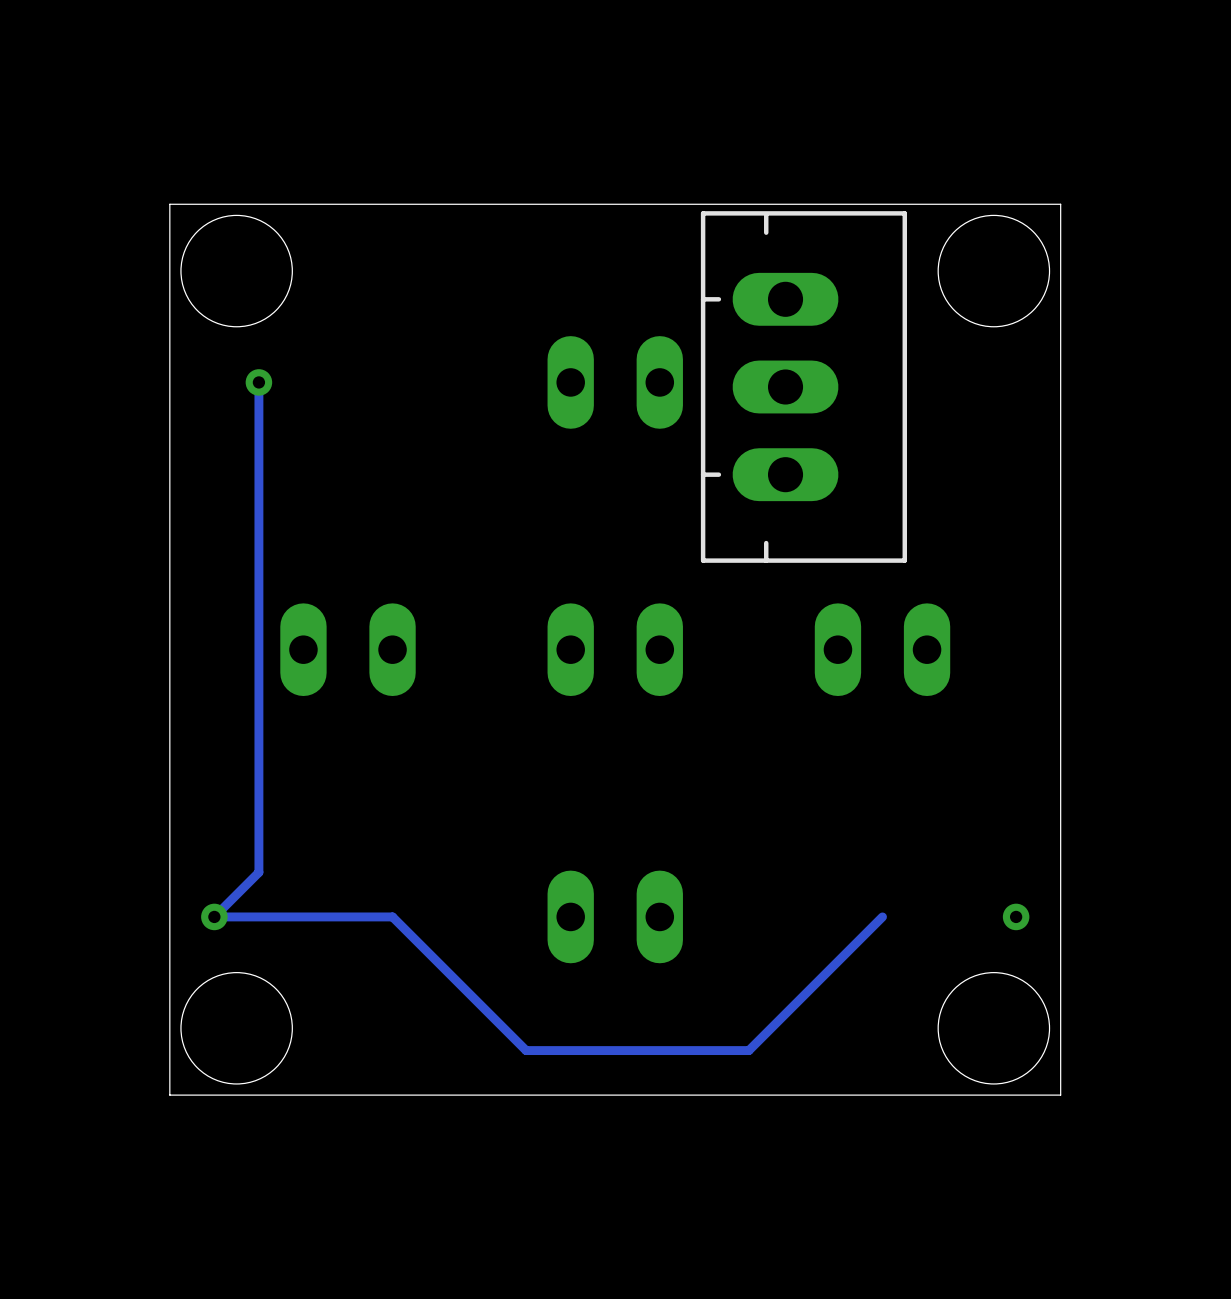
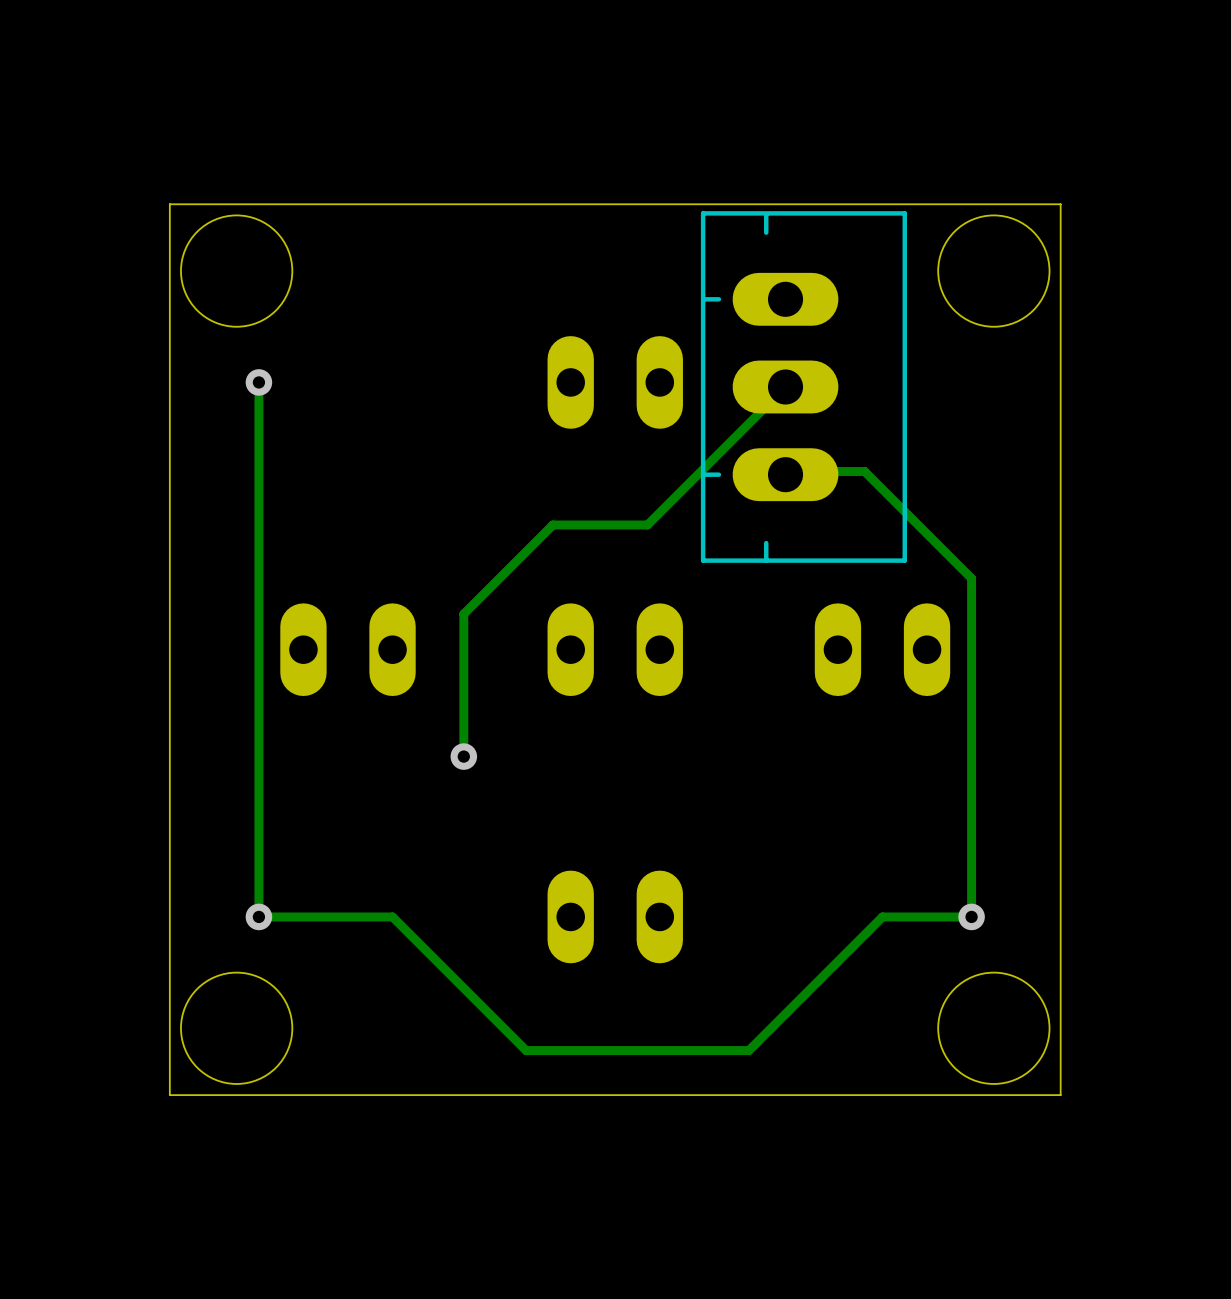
track: none -> (785, 387) (647, 524) (552, 524) (463, 614) (463, 756)
track: none -> (785, 474) (788, 471) (864, 471) (971, 578) (971, 916) (882, 916)
via: none -> (463, 756)
track: (258, 872) (214, 916) (258, 916) -> (258, 872) (258, 916)
via position: (214, 916) -> (258, 916)
via position: (1016, 916) -> (971, 916)

